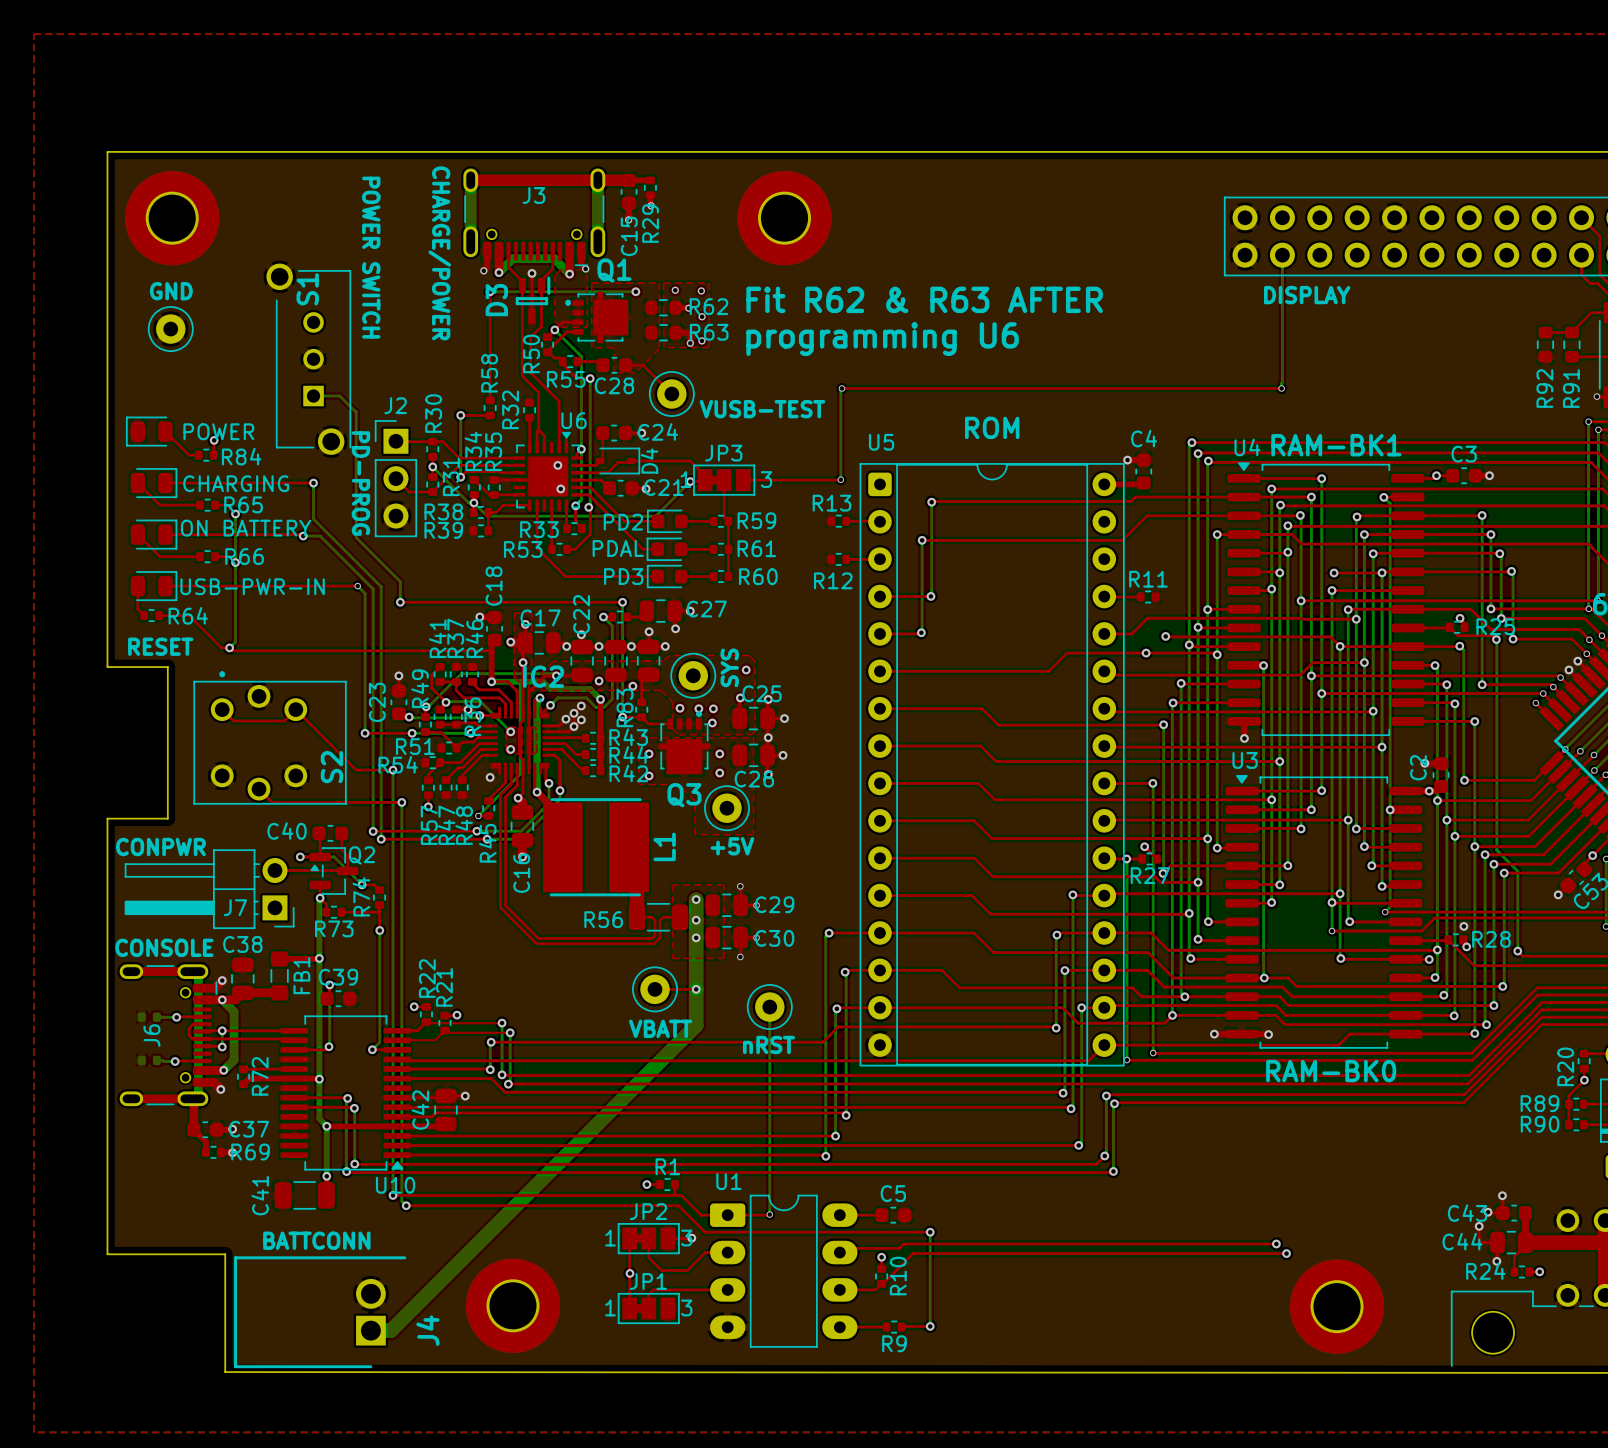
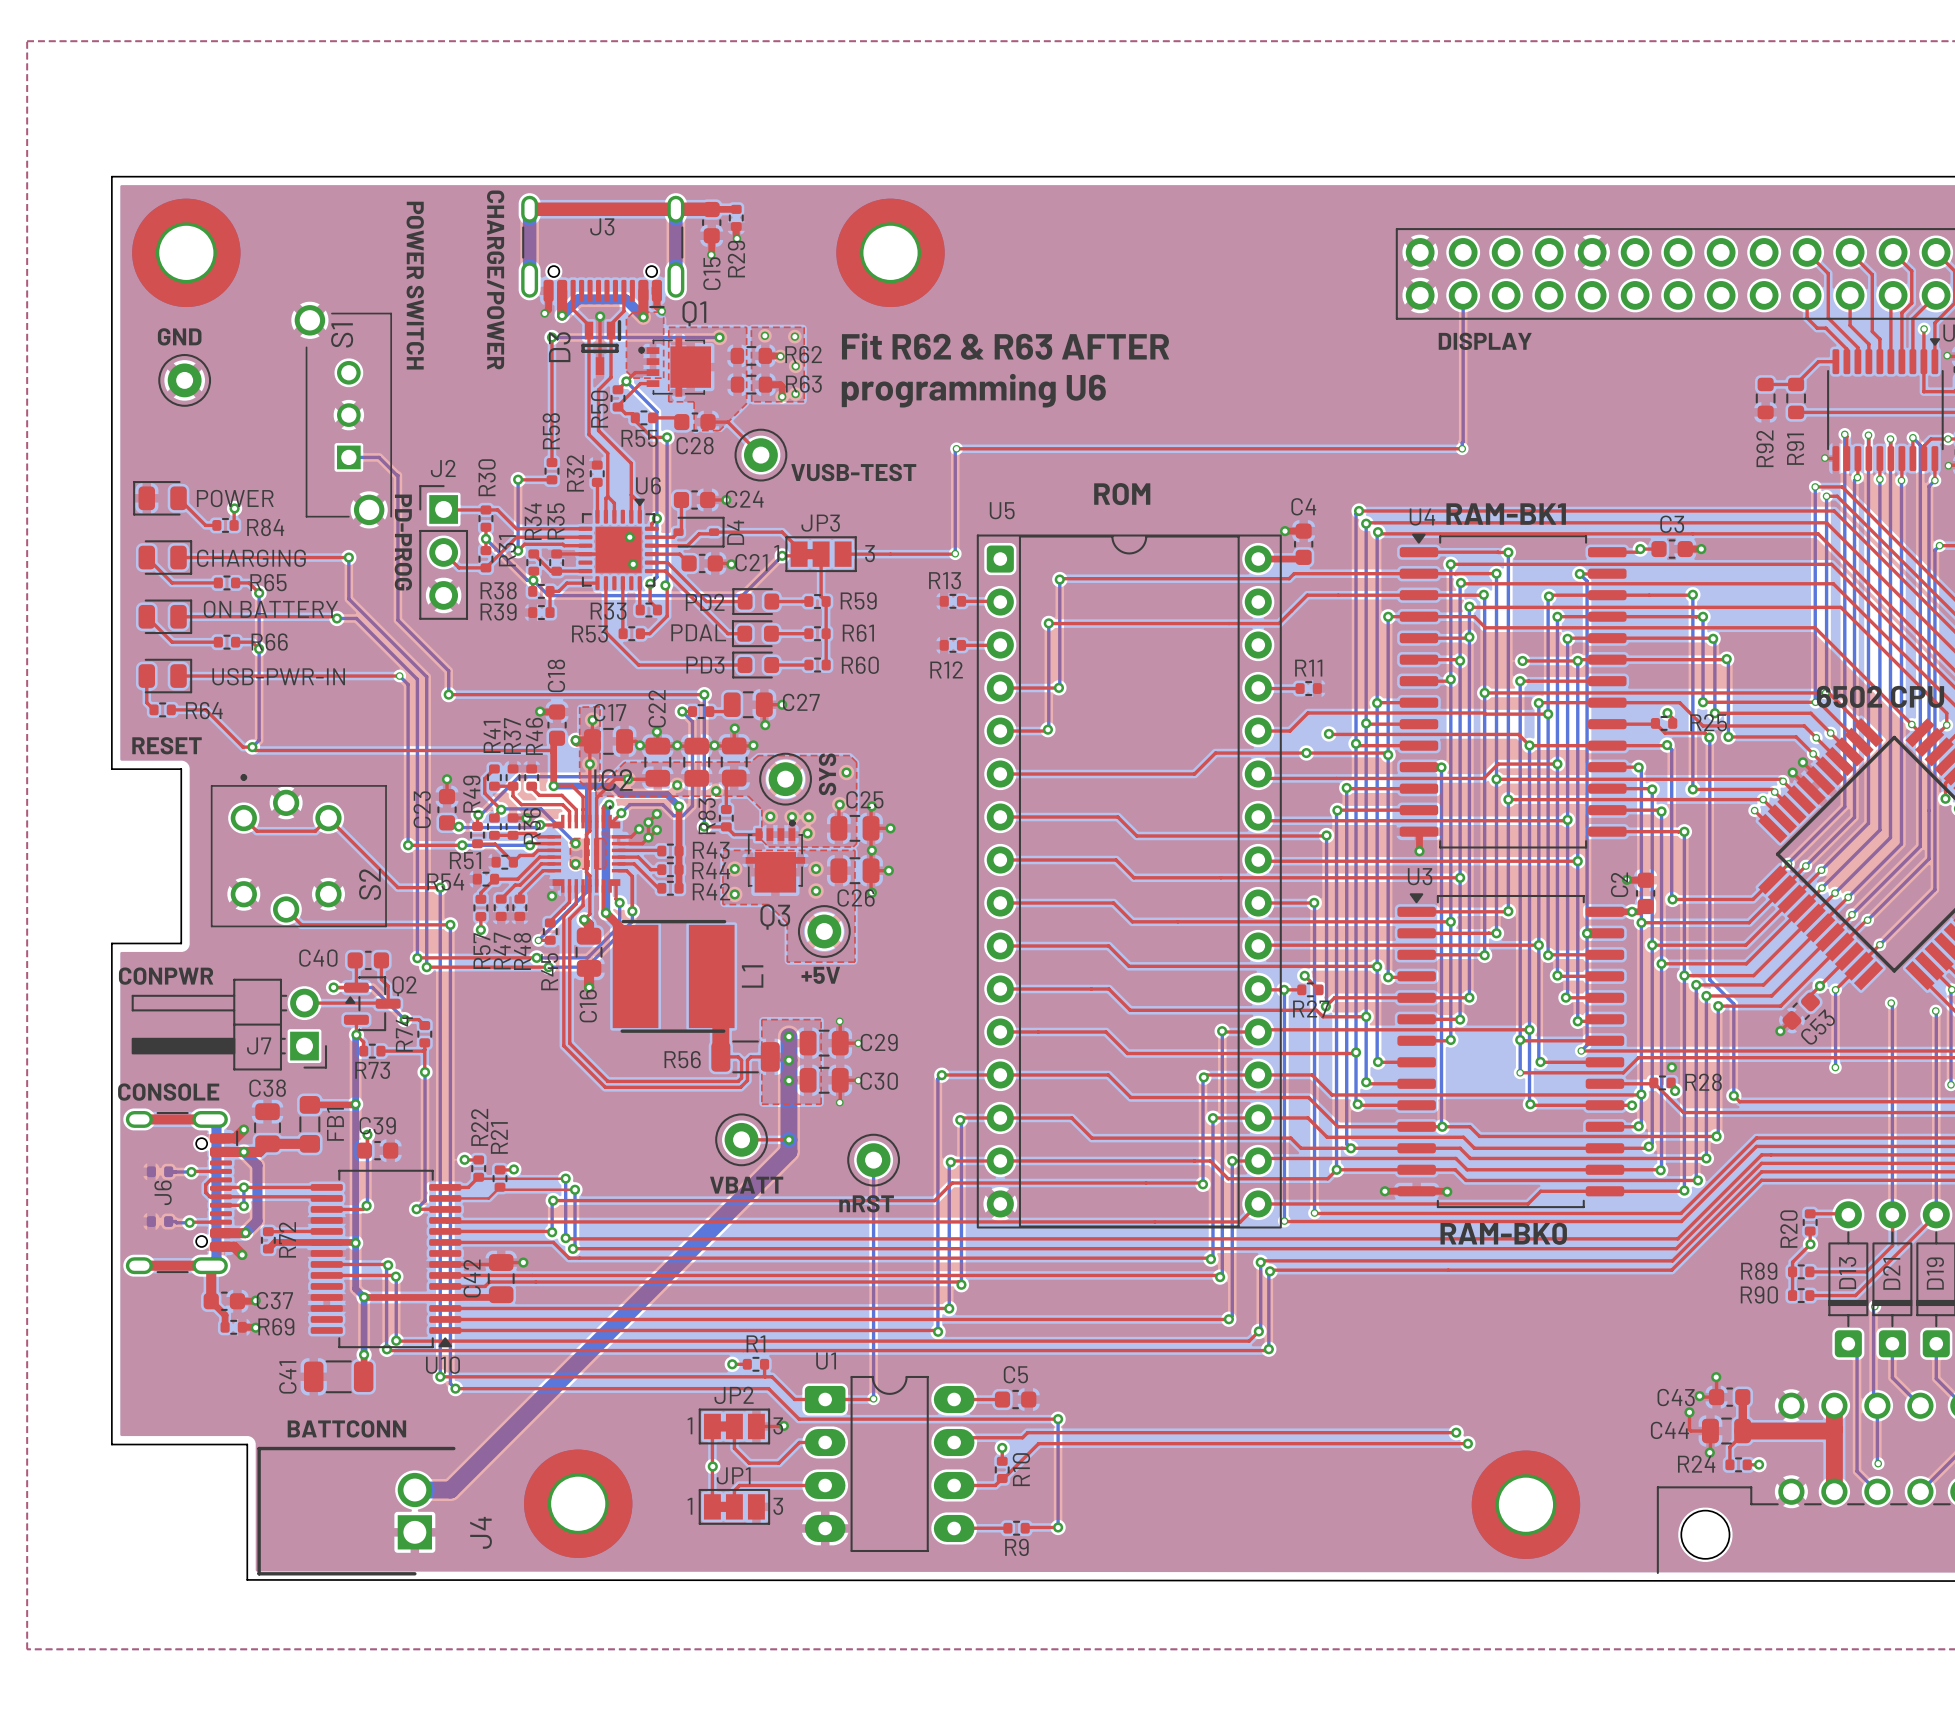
bottom track: (696, 999) (696, 1025) (390, 1330) (370, 1330) -> (788, 1151) (450, 1490) (414, 1490)

